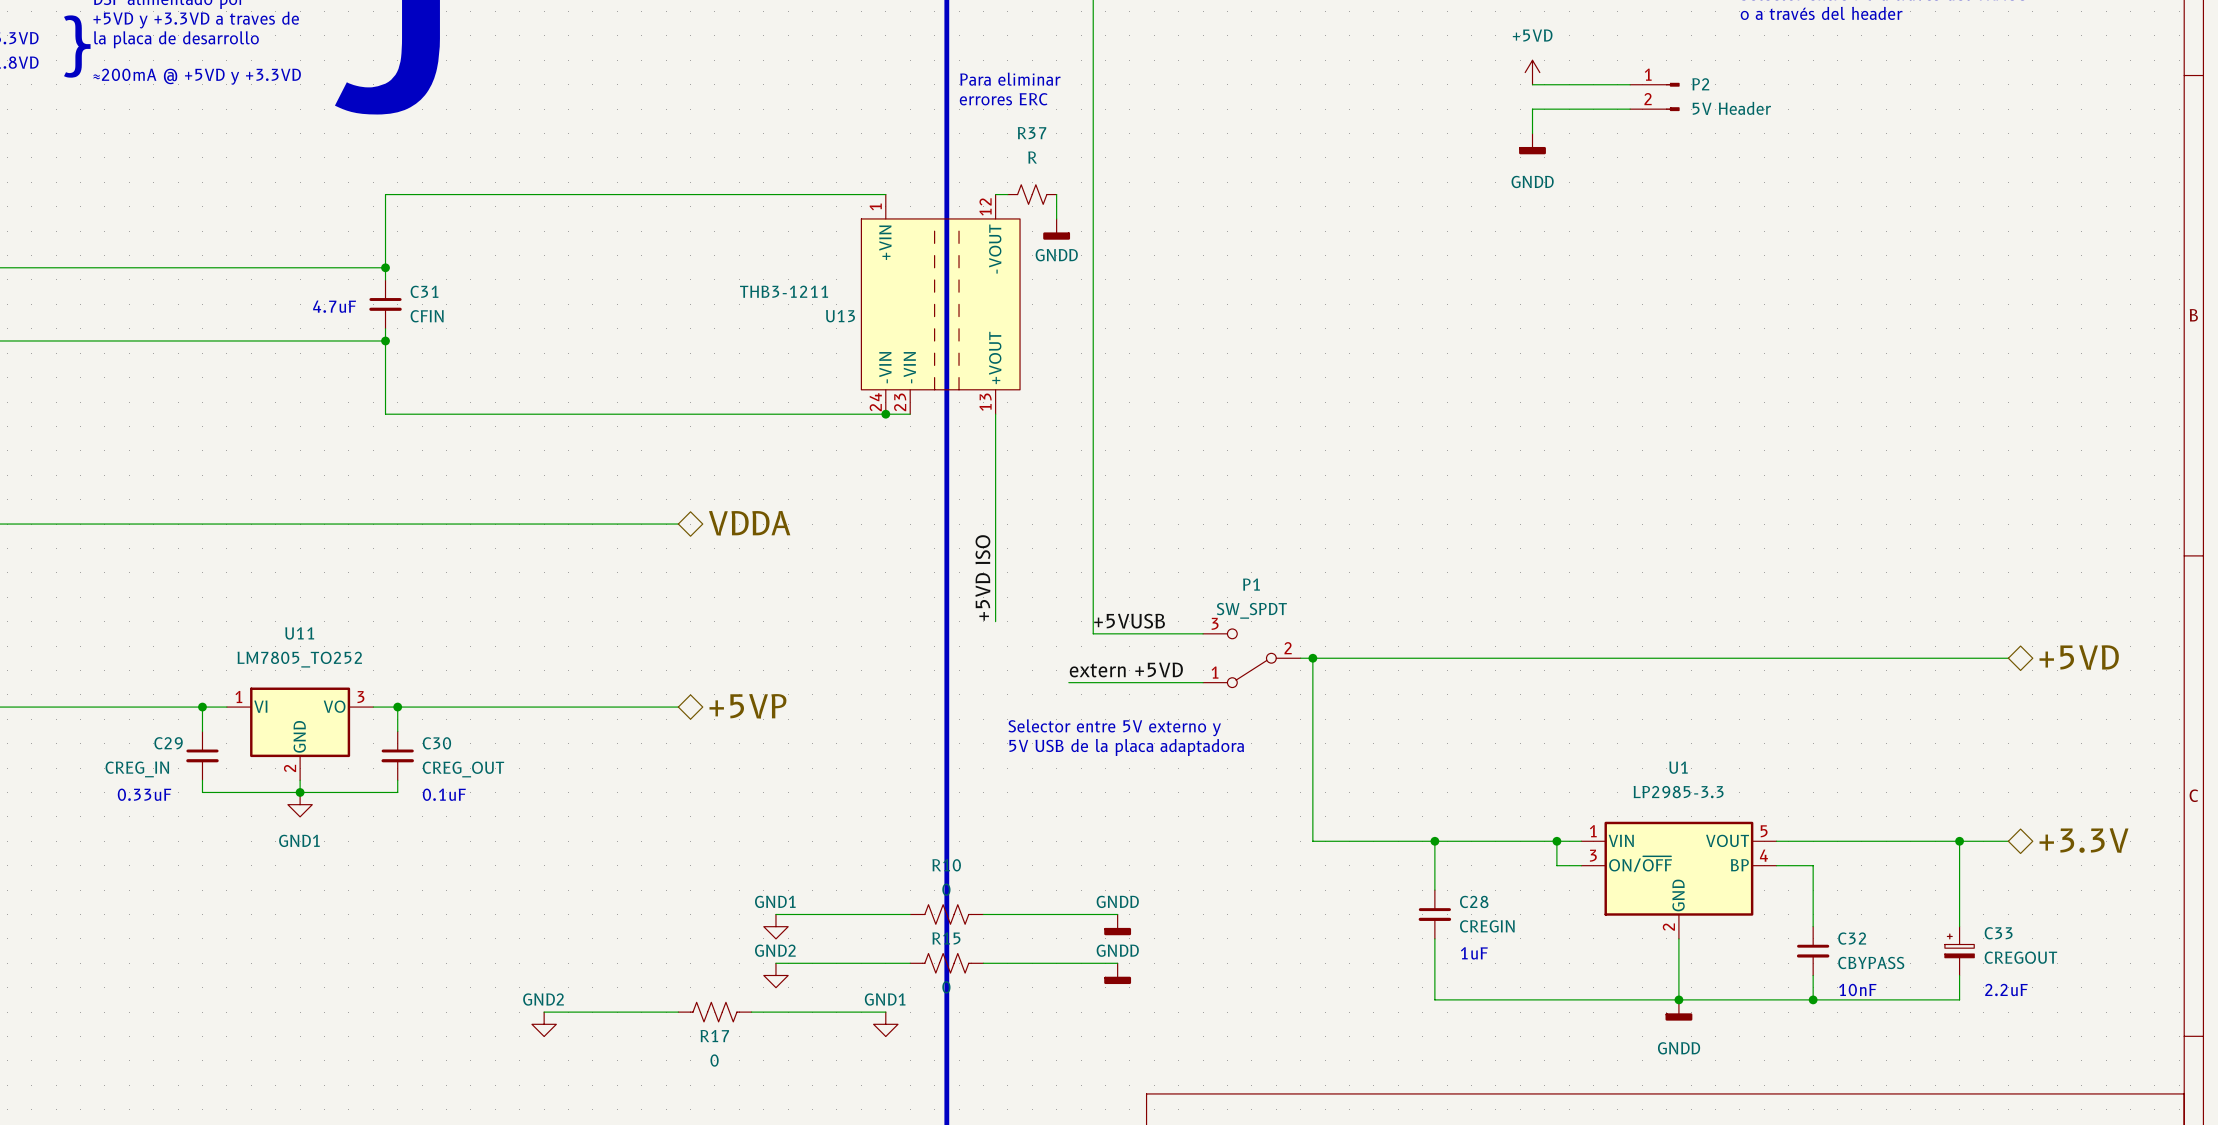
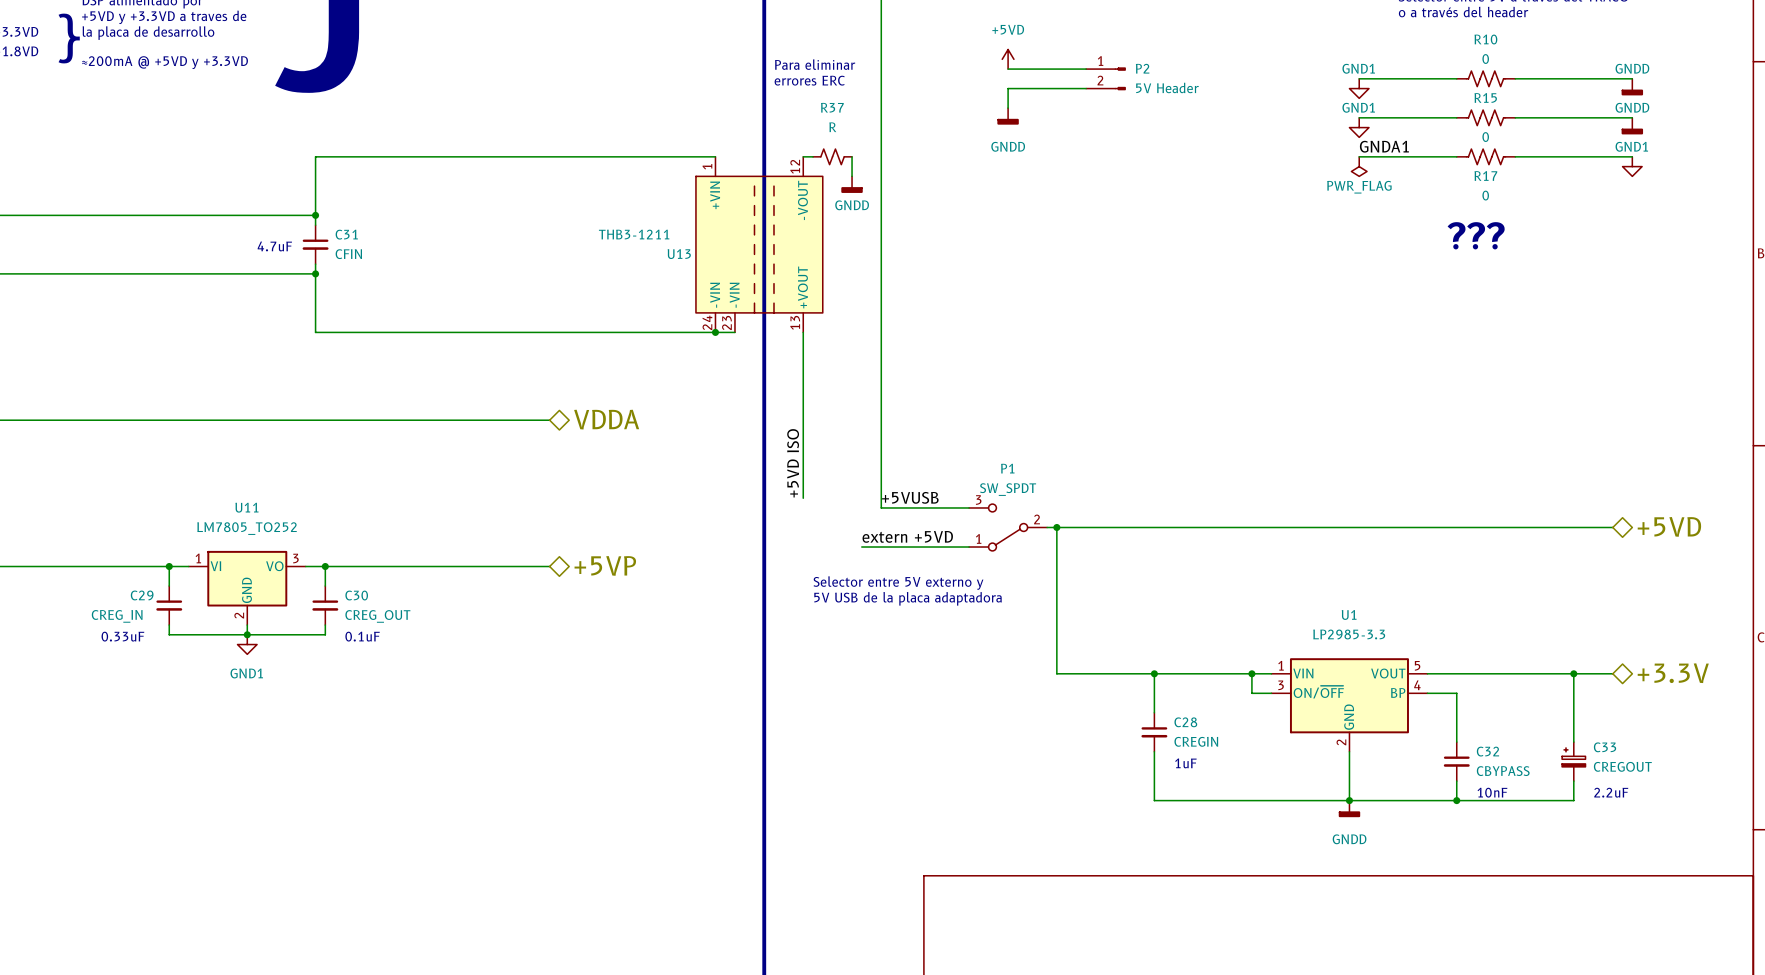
power symbol: none -> +5VD (1008, 59)
power symbol: +5VD (1532, 72) -> none
wire: none -> (1008, 69) (1086, 69)
wire: (1532, 84) (1630, 84) -> none
P2 position: (1654, 96) -> (1105, 78)
wire: none -> (1359, 78) (1456, 78)
wire: none -> (1515, 78) (1632, 78)
power symbol: none -> GNDD (1632, 87)
wire: none -> (1086, 88) (1008, 88) (1008, 108)
wire: (1630, 109) (1532, 109) (1532, 133) -> none
power symbol: none -> GND1 (1359, 88)
power symbol: none -> GNDD (1008, 116)
power symbol: GNDD (1532, 143) -> none
wire: none -> (1359, 117) (1456, 117)
wire: none -> (1515, 117) (1632, 117)
power symbol: none -> GNDD (1632, 126)
power symbol: none -> GND1 (1359, 127)
label: none -> GNDA1 (1384, 146)
wire: none -> (1359, 156) (1456, 156)
wire: none -> (1515, 156) (1632, 156)
power symbol: none -> PWR_FLAG (1359, 166)
power symbol: none -> GND1 (1632, 166)
text: none -> ??? (1476, 235)
wire: (775, 914) (910, 914) -> none
R10 position: (946, 914) -> (1486, 78)
wire: (983, 914) (1117, 914) -> none
power symbol: GNDD (1117, 924) -> none
power symbol: GND1 (775, 926) -> none
wire: (775, 963) (910, 963) -> none
R15 position: (946, 963) -> (1486, 117)
wire: (983, 963) (1117, 963) -> none
power symbol: GNDD (1117, 973) -> none
power symbol: GND2 (775, 975) -> none
wire: (544, 1012) (678, 1012) -> none
R17 position: (714, 1012) -> (1486, 156)
wire: (751, 1012) (885, 1012) -> none
power symbol: GND2 (544, 1024) -> none
power symbol: GND1 (885, 1024) -> none

